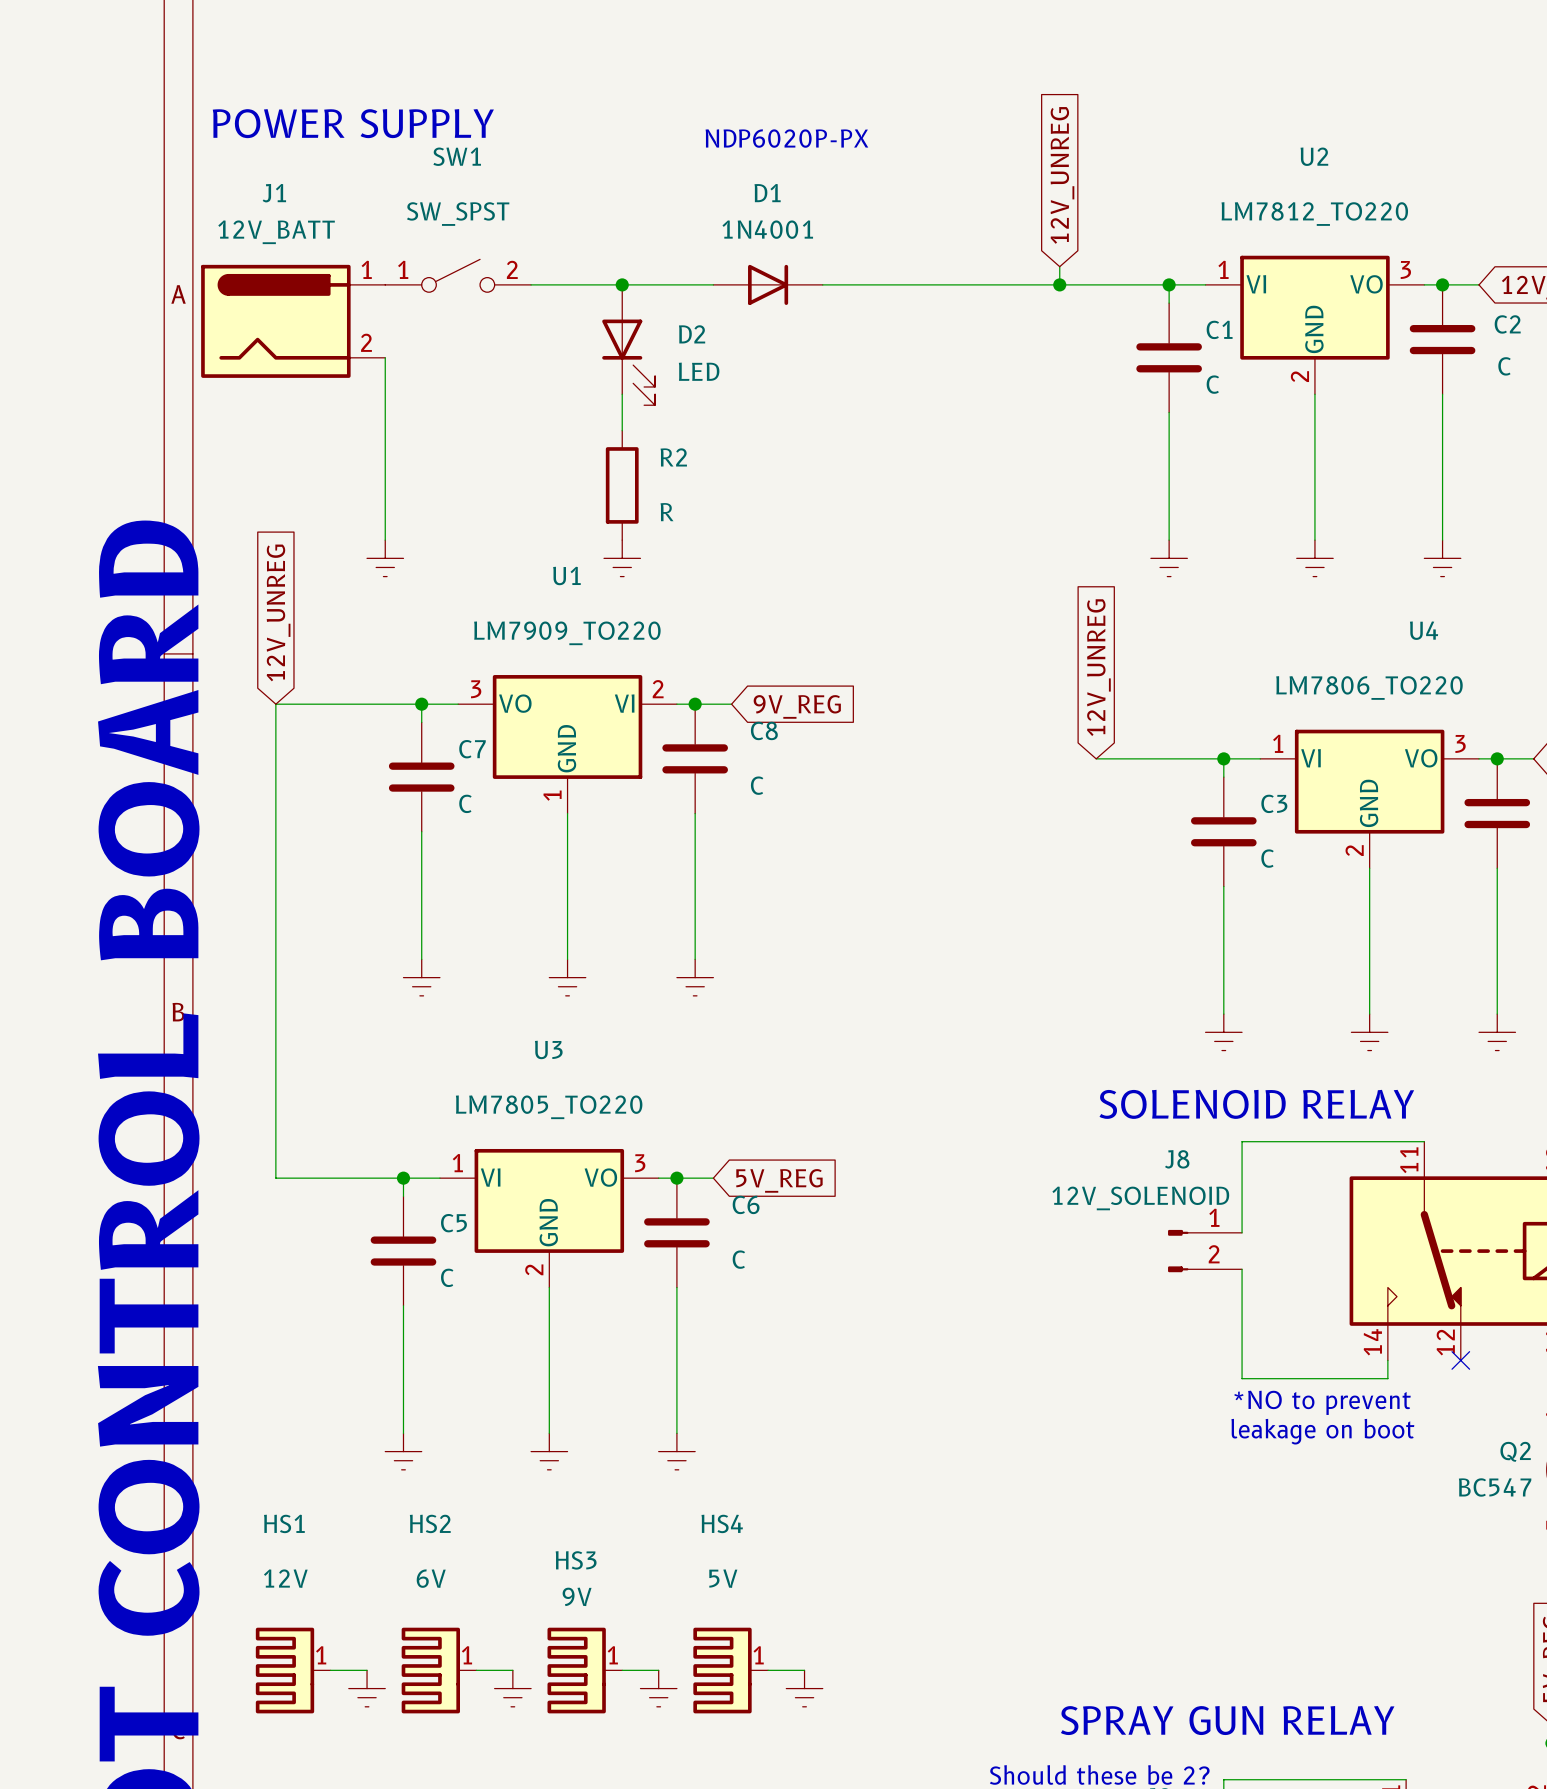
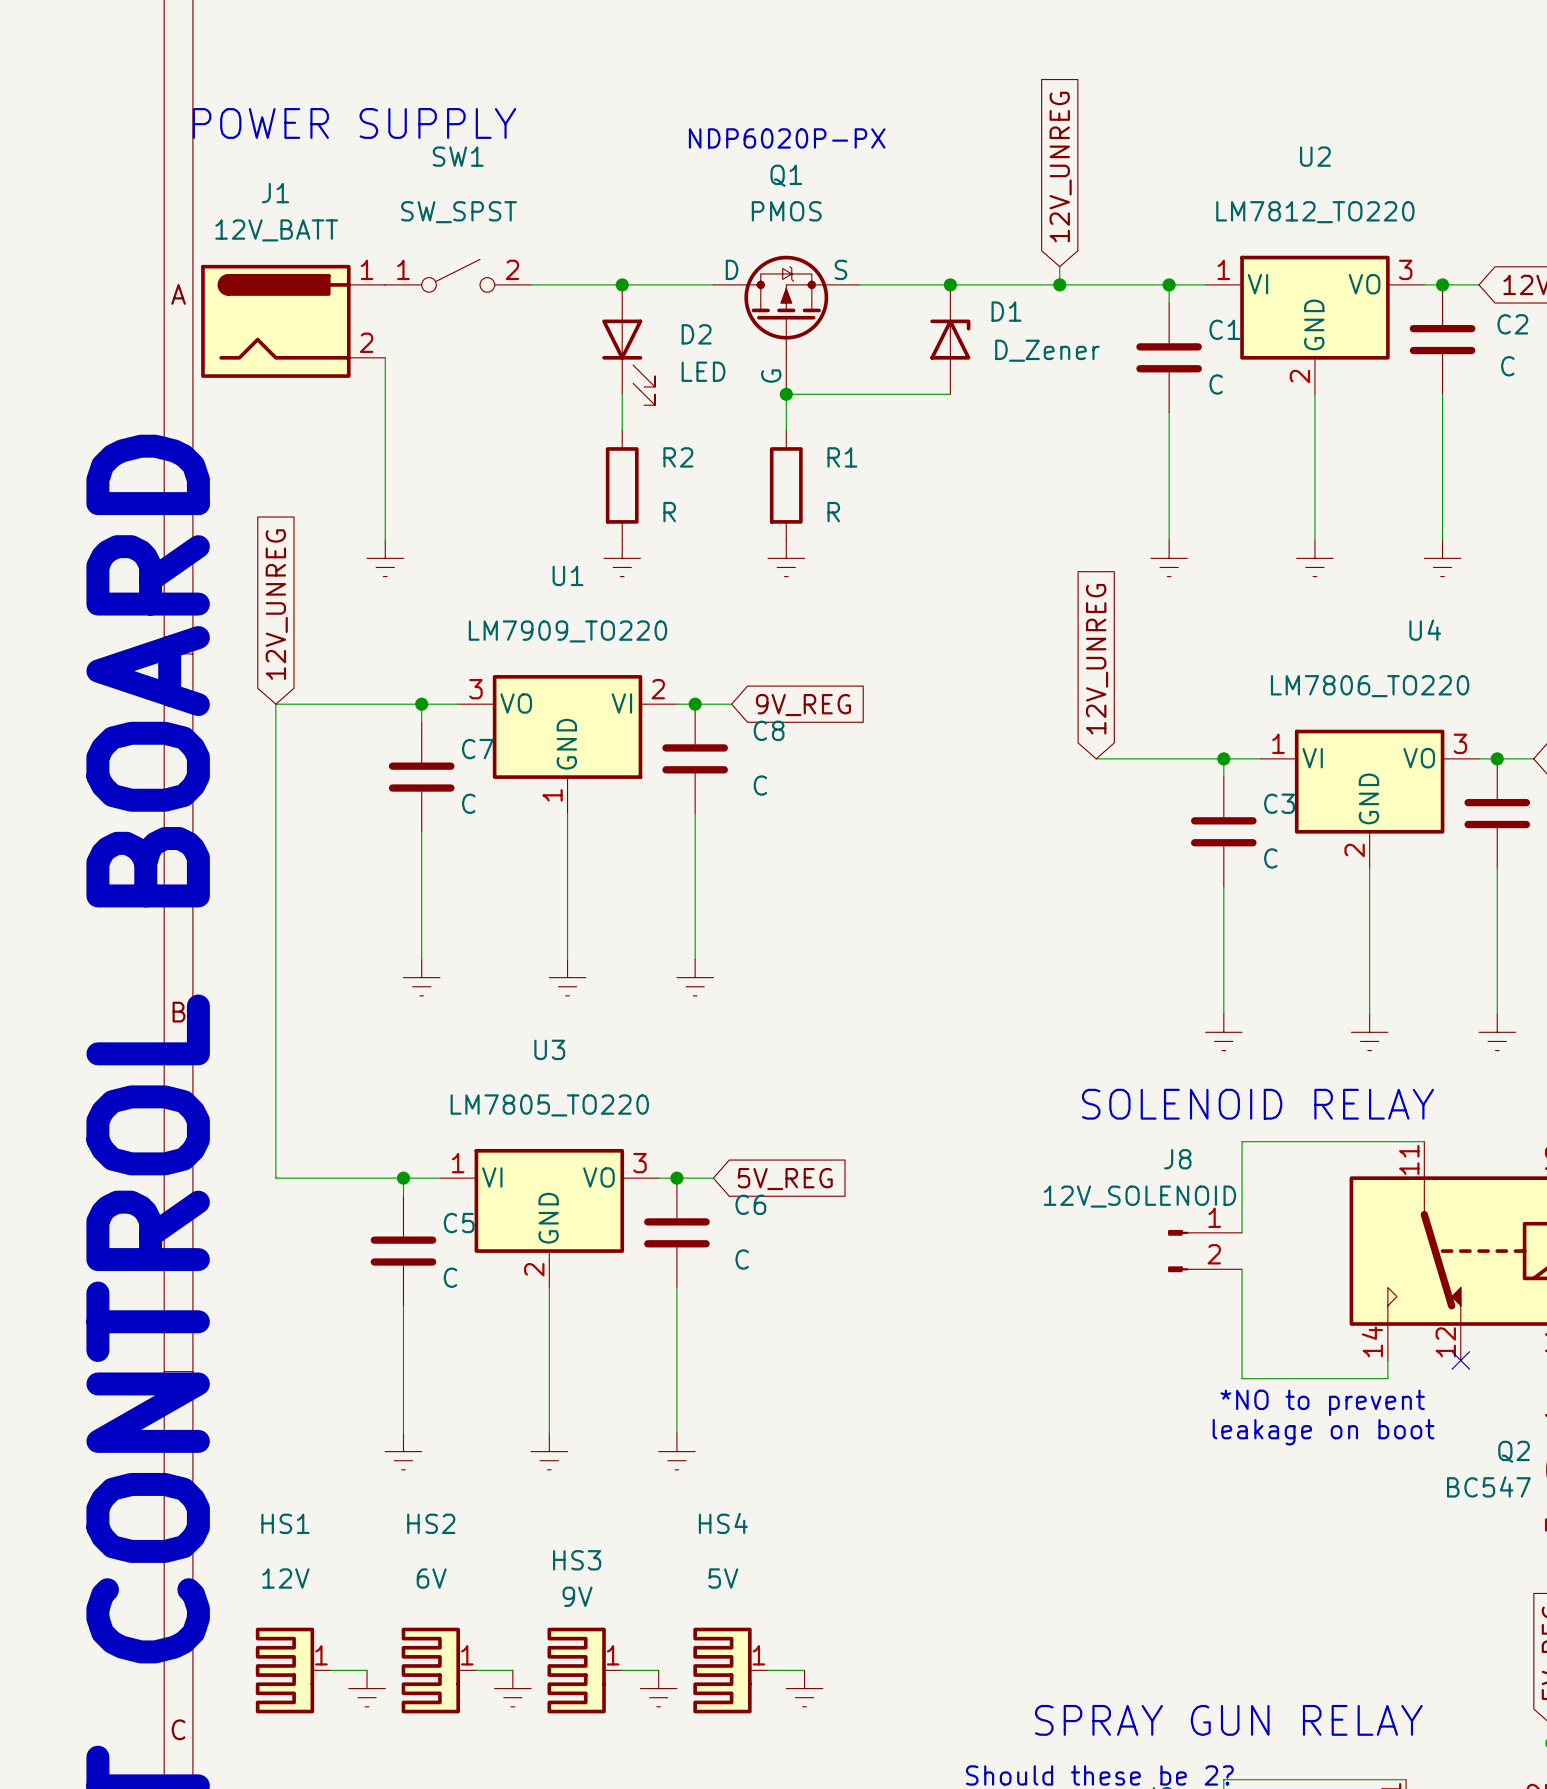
D1 name position: D1 (767, 193) -> D1 (1006, 311)
D1 value: 1N4001 (767, 229) -> D_Zener (1047, 350)
D1 symbol: [713, 264, 823, 305] -> [930, 284, 971, 395]
junction: none -> (950, 284)
Q1: none -> PMOS (786, 325)
junction: none -> (786, 394)
wire: none -> (950, 394) (786, 394) (786, 430)
R1: none -> R (786, 485)
power symbol: none -> (786, 558)

